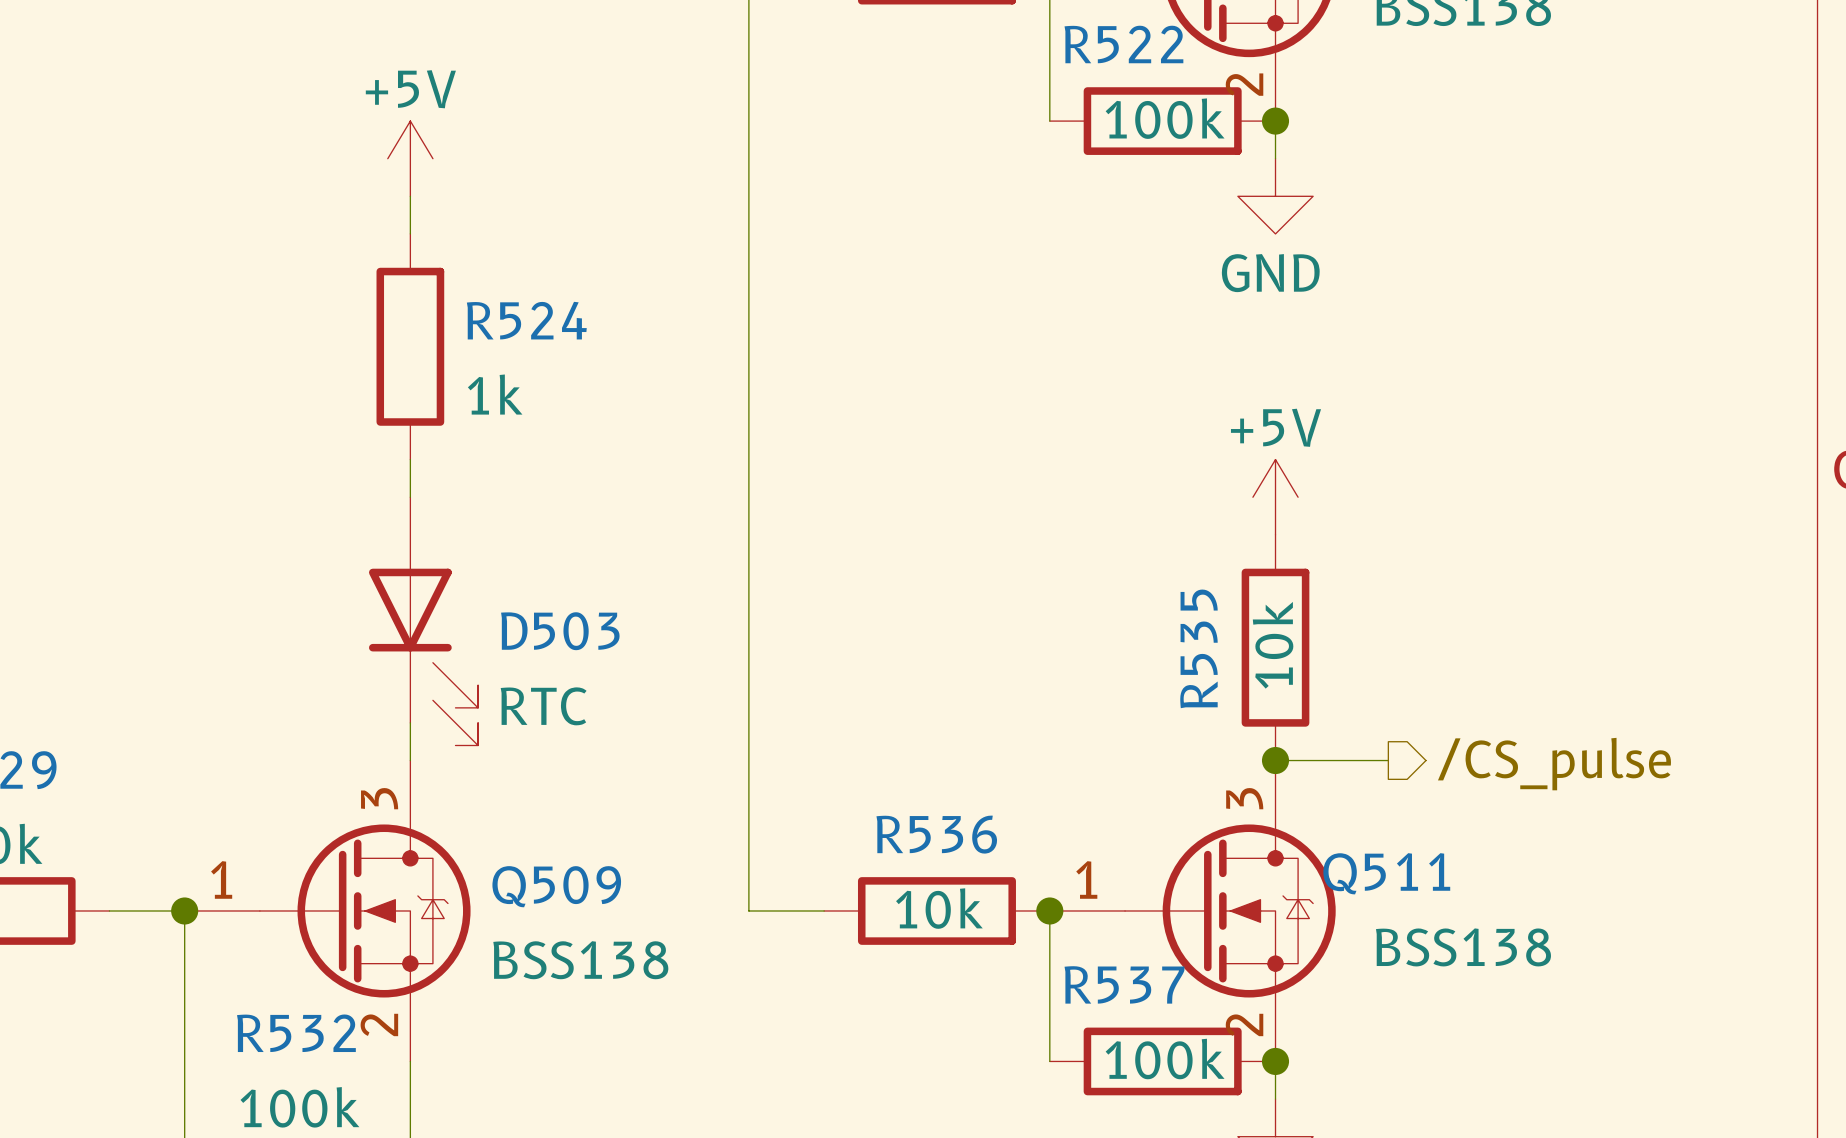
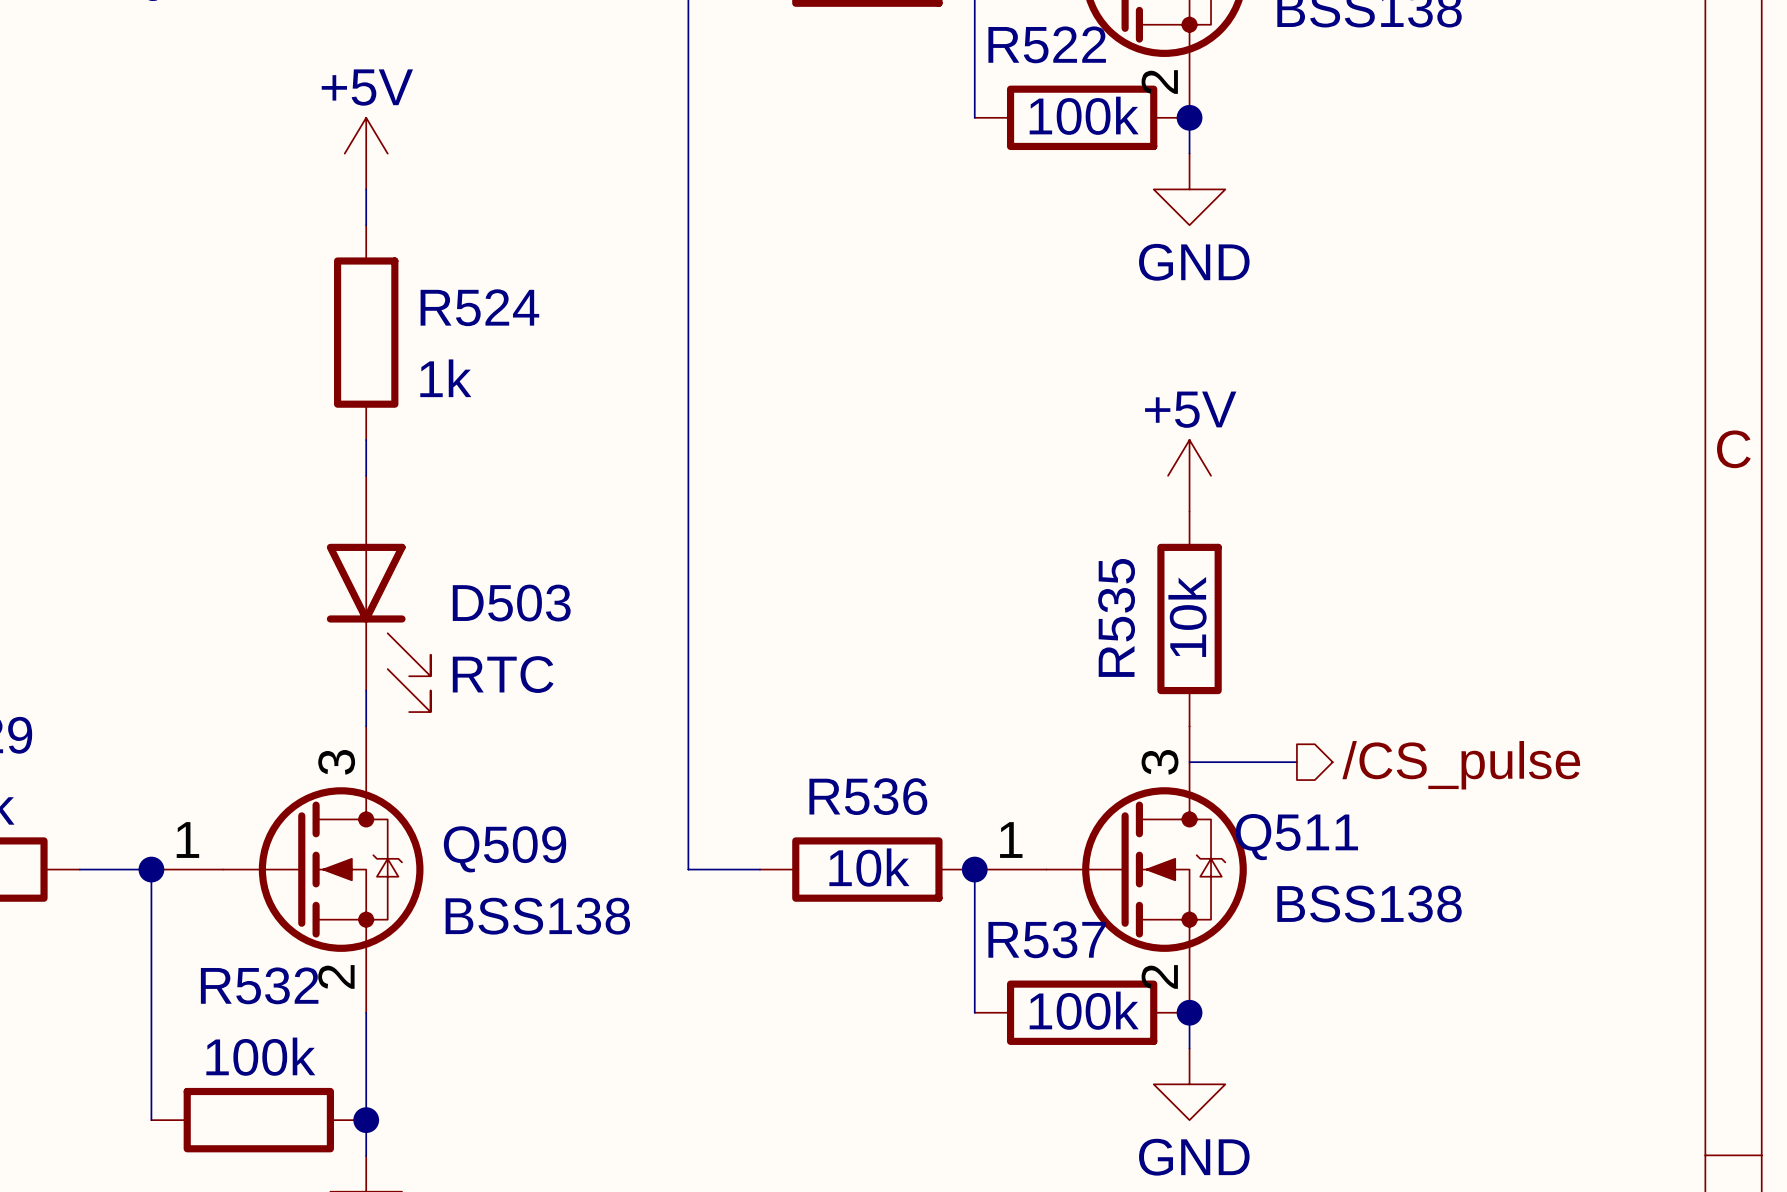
wire: (1275, 760) (1388, 760) -> (1189, 762) (1296, 762)
junction: (1275, 760) -> none
hierarchical label position: /CS_pulse (1554, 764) -> /CS_pulse (1461, 765)

